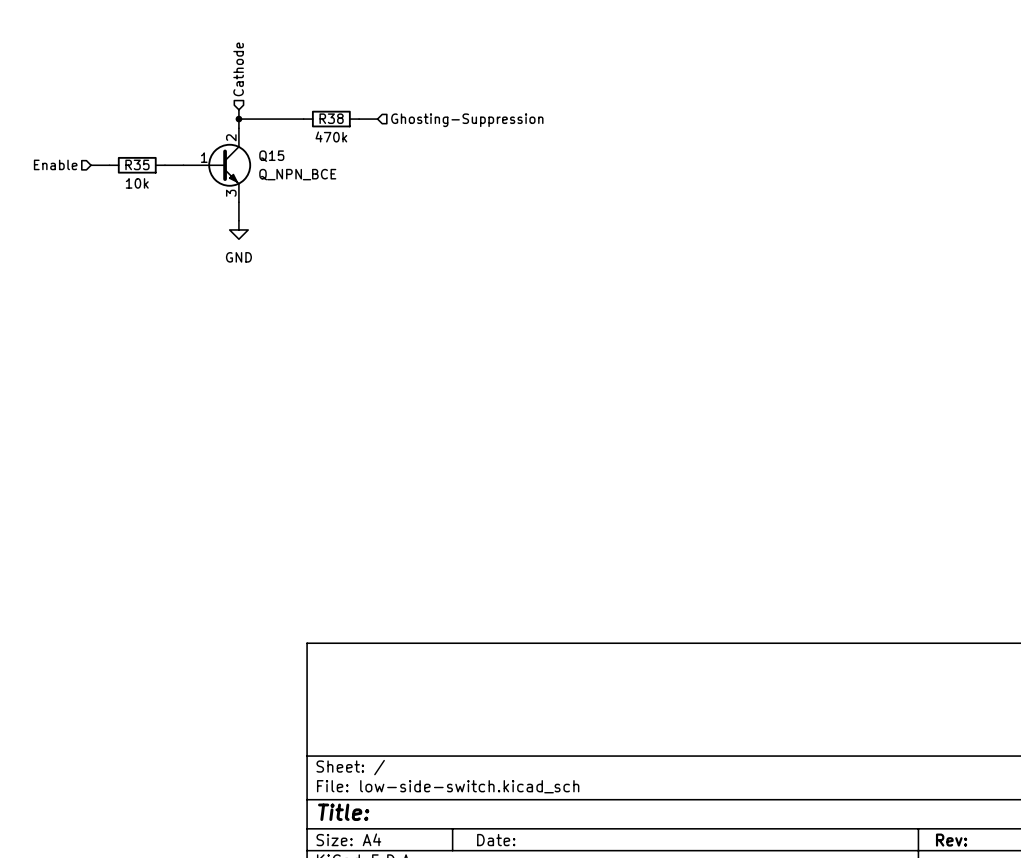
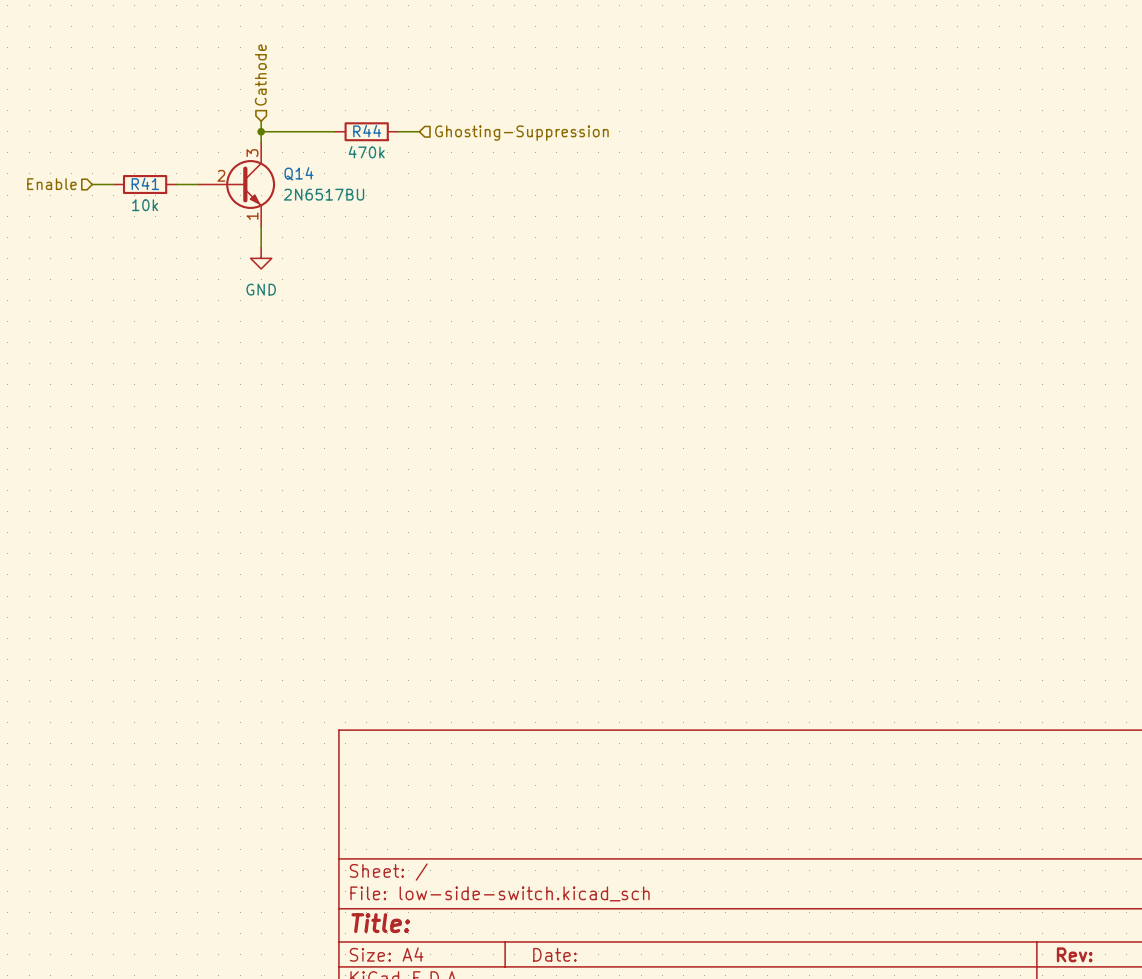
R38 name: R38 (331, 118) -> R44 (367, 131)
Q15 pin number: 2 (231, 137) -> 3 (252, 153)
Q15 name: Q15 (271, 156) -> Q14 (298, 173)
Q15 pin number: 1 (204, 157) -> 2 (221, 175)
R35 name: R35 (137, 164) -> R41 (145, 183)
Q15 value: Q_NPN_BCE (297, 174) -> 2N6517BU (324, 194)
Q15 pin number: 3 (231, 193) -> 1 (252, 216)

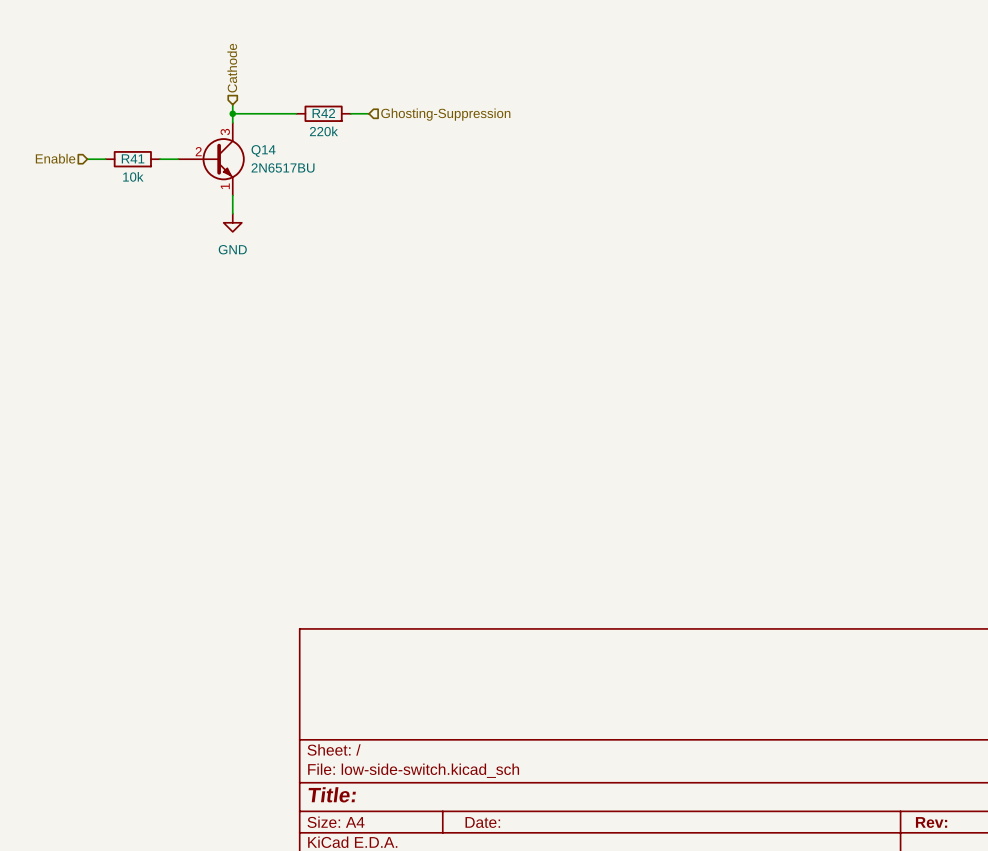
R44 name: R44 (367, 131) -> R42 (323, 113)
R44 value: 470k (366, 152) -> 220k (323, 131)

